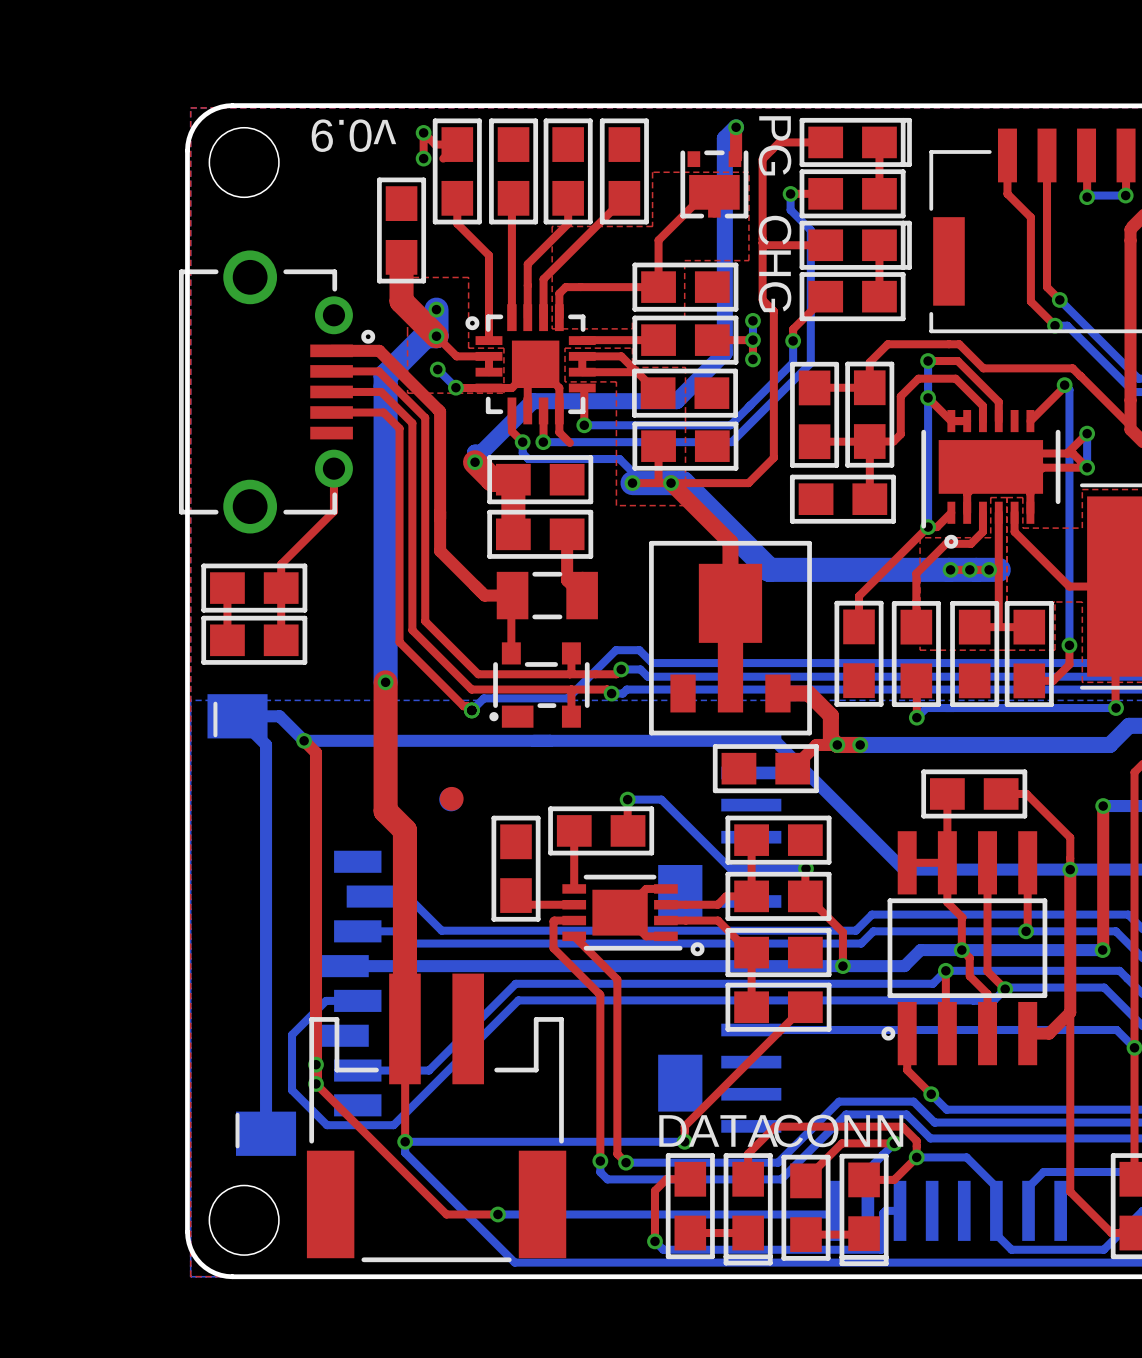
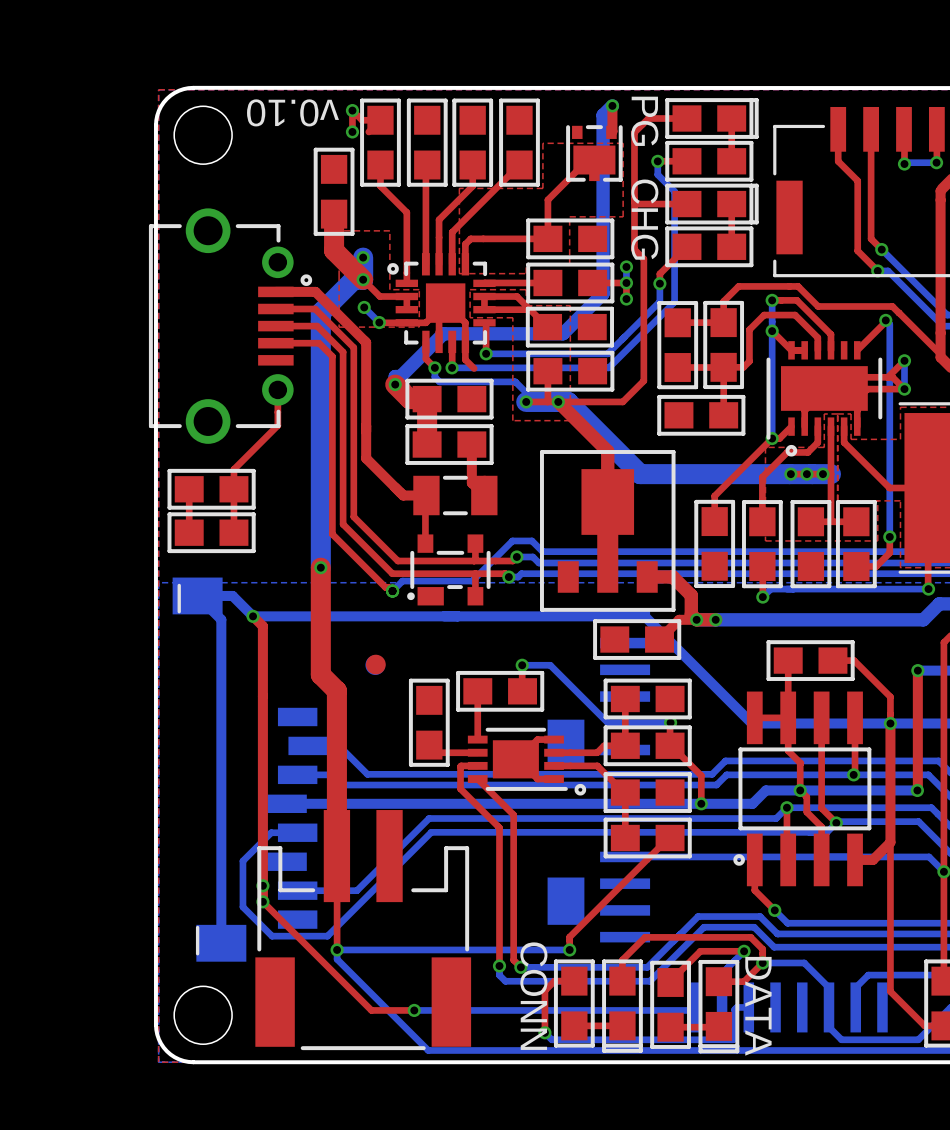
text: v0.9 (353, 135) -> v0.10 (293, 112)
text rotation: 0° (718, 1130) -> 90° clockwise (758, 1006)
text position: DATA (718, 1130) -> DATA (758, 1006)
text rotation: 0° (838, 1130) -> 90° clockwise (533, 996)
text position: CONN (838, 1130) -> CONN (533, 996)

